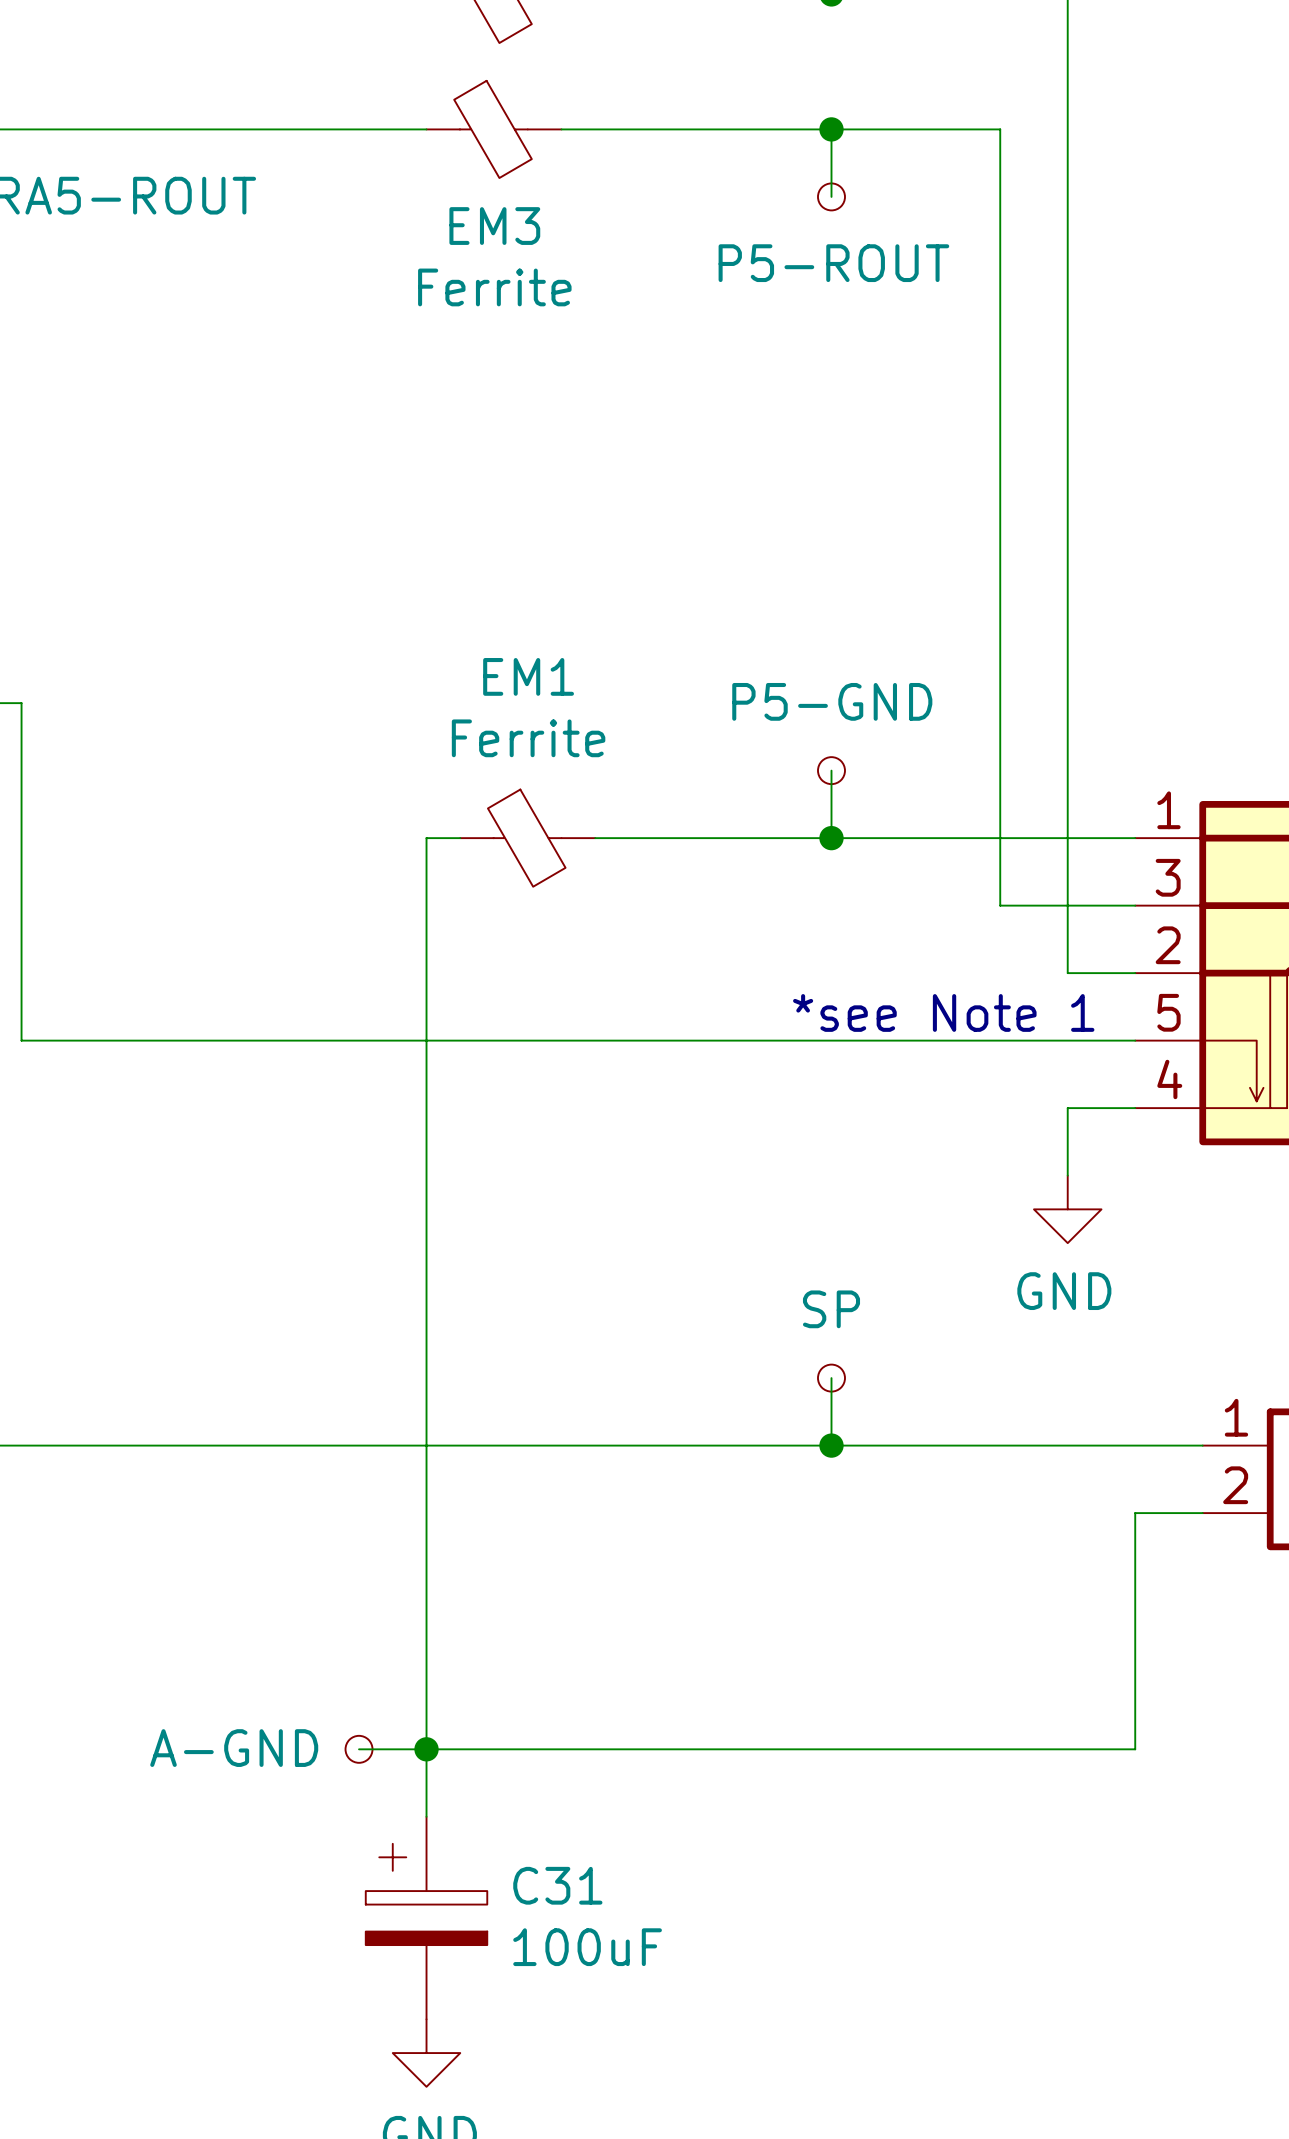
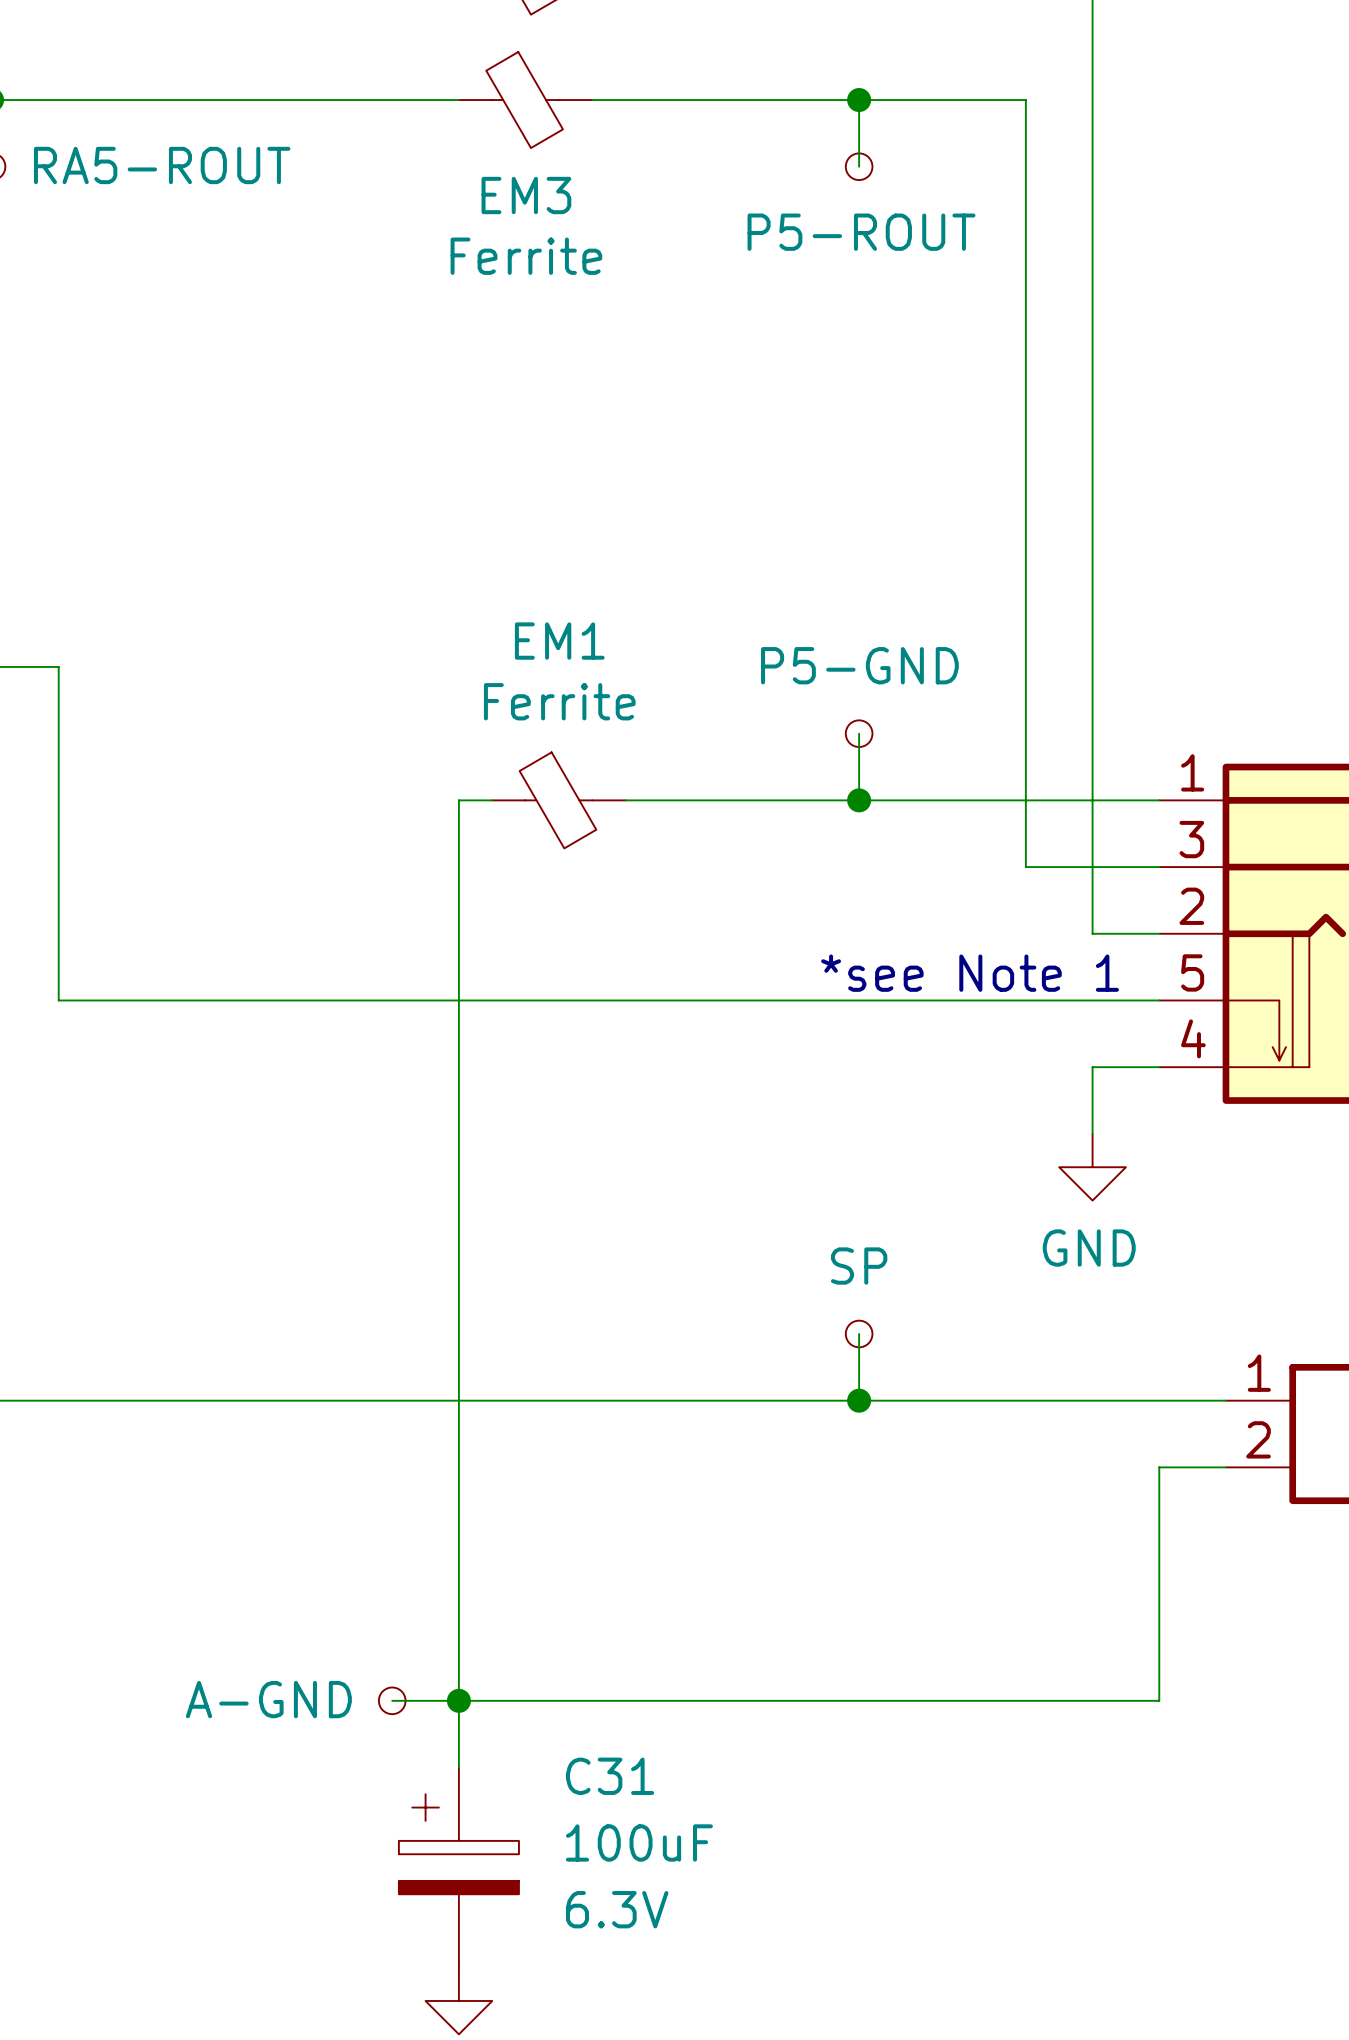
C31 name position: C31 (557, 1885) -> C31 (610, 1776)
C31 value position: 100uF (587, 1947) -> 100uF (639, 1842)
C31 text: none -> 6.3V (617, 1909)

